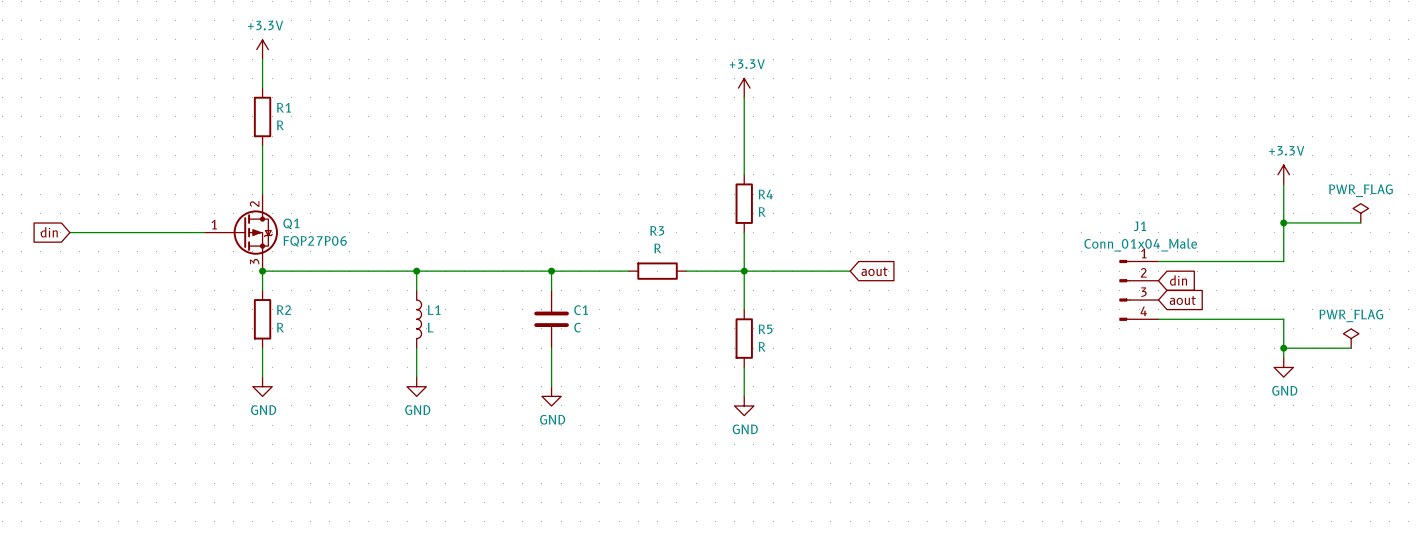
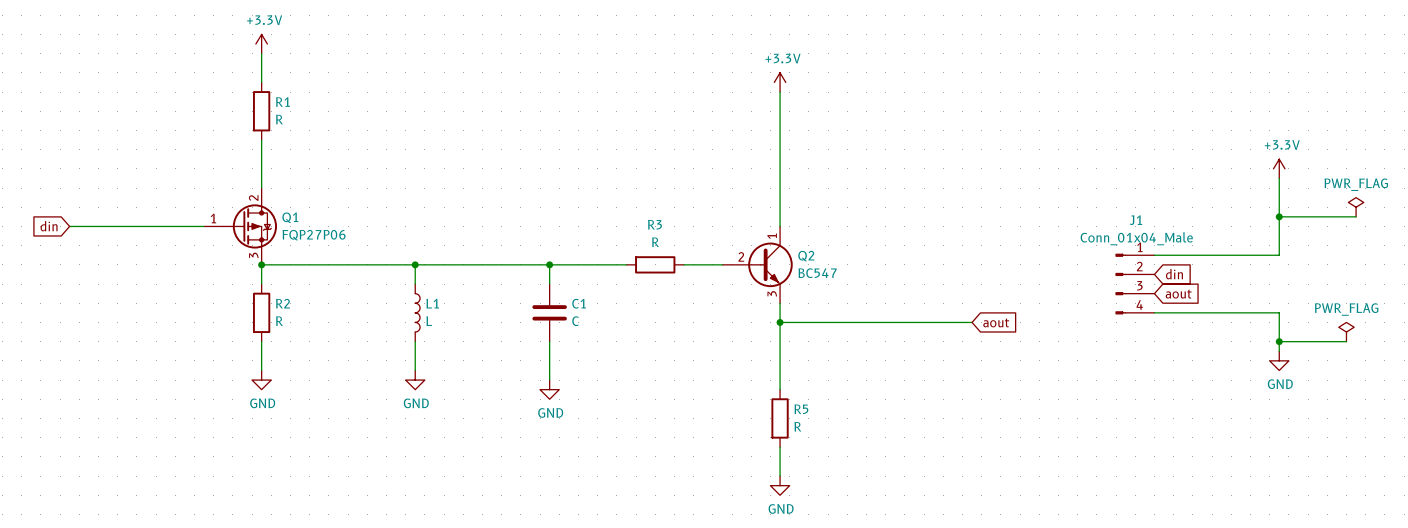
power symbol position: +3.3V (744, 88) -> +3.3V (780, 82)
wire: (744, 97) (744, 174) -> none
wire: none -> (780, 92) (780, 226)
R4: R (744, 203) -> none
wire: (744, 232) (744, 309) -> none
wire: (724, 271) (850, 271) -> none
junction: (744, 271) -> none
Q2: none -> BC547 (757, 264)
global label position: aout (874, 271) -> aout (996, 322)
wire: none -> (780, 303) (780, 389)
wire: none -> (780, 322) (972, 322)
junction: none -> (780, 322)
R5 position: (744, 338) -> (780, 418)
wire: (744, 367) (744, 396) -> (780, 447) (780, 476)
power symbol position: GND (744, 405) -> GND (780, 485)

